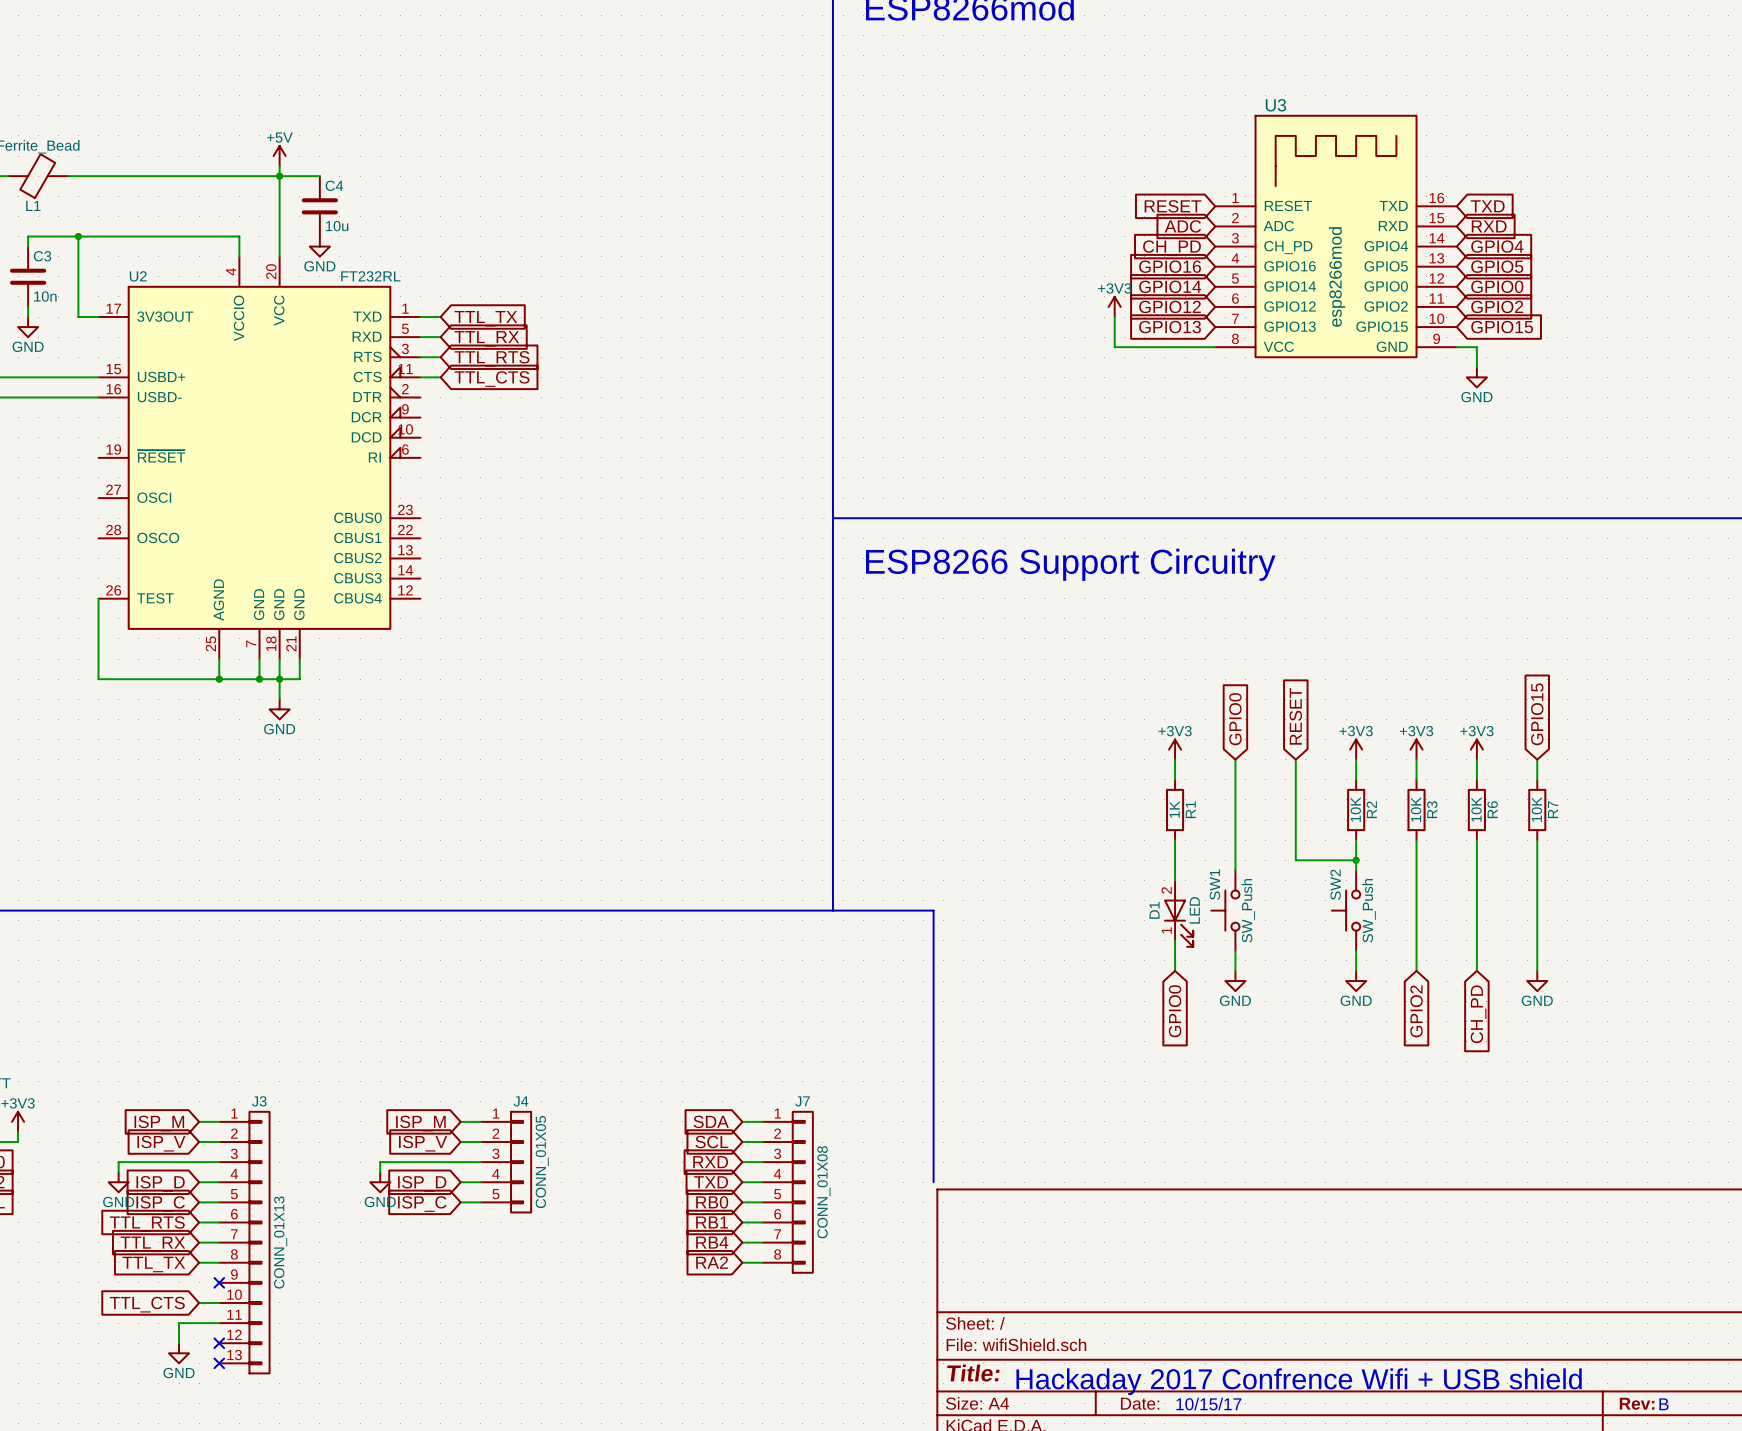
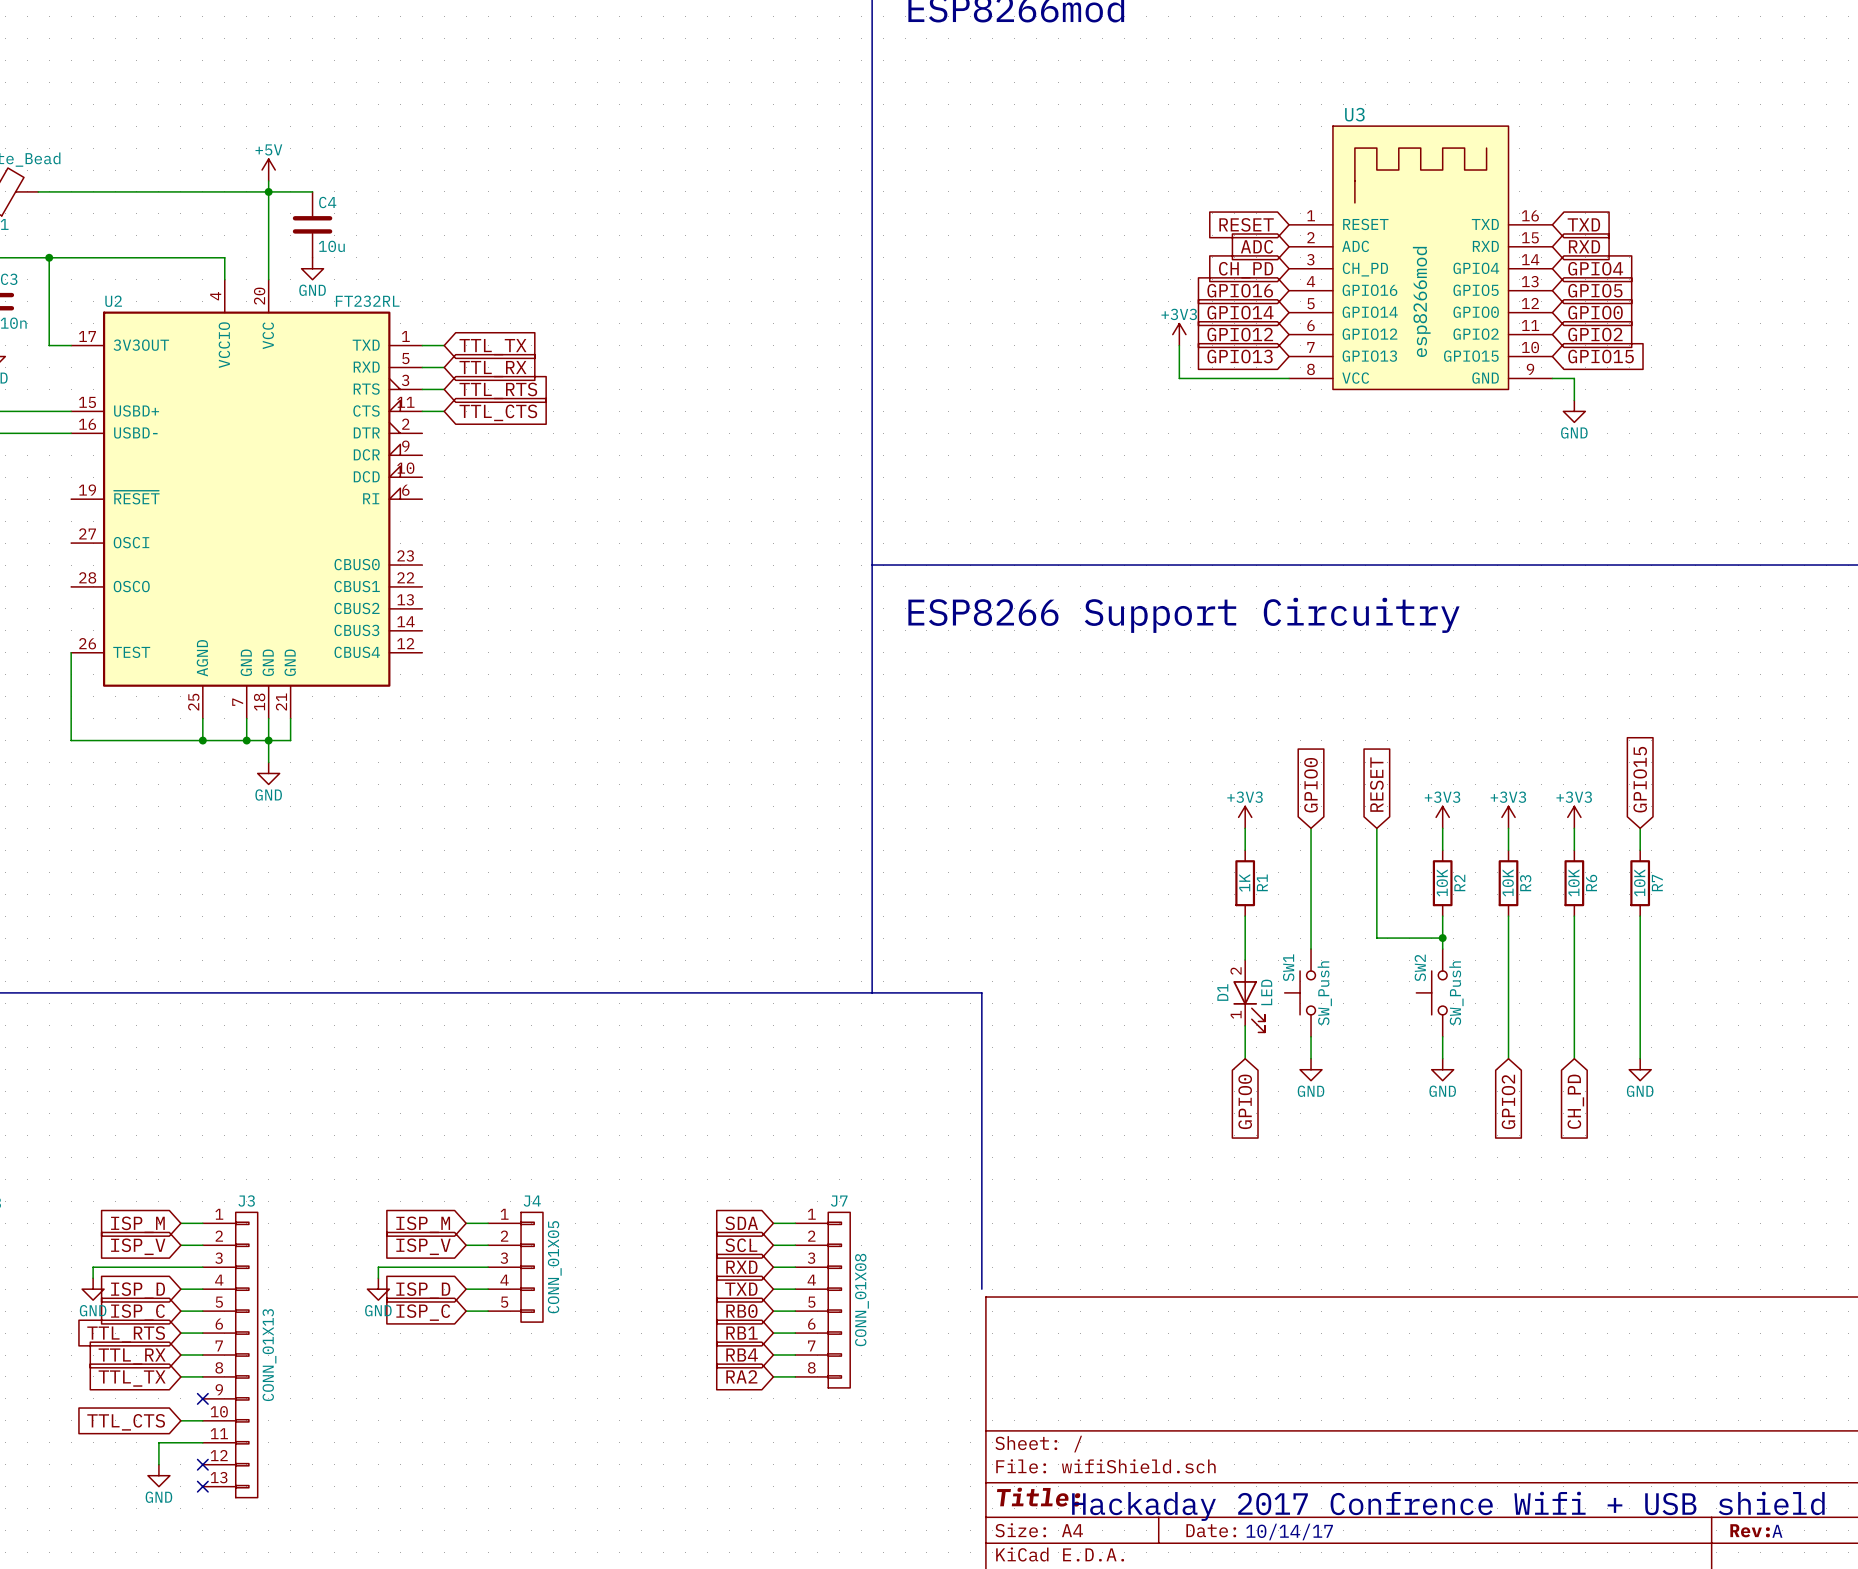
text: 10/15/17 (1208, 1404) -> 10/14/17 (1289, 1532)
text: B (1663, 1404) -> A (1777, 1531)

